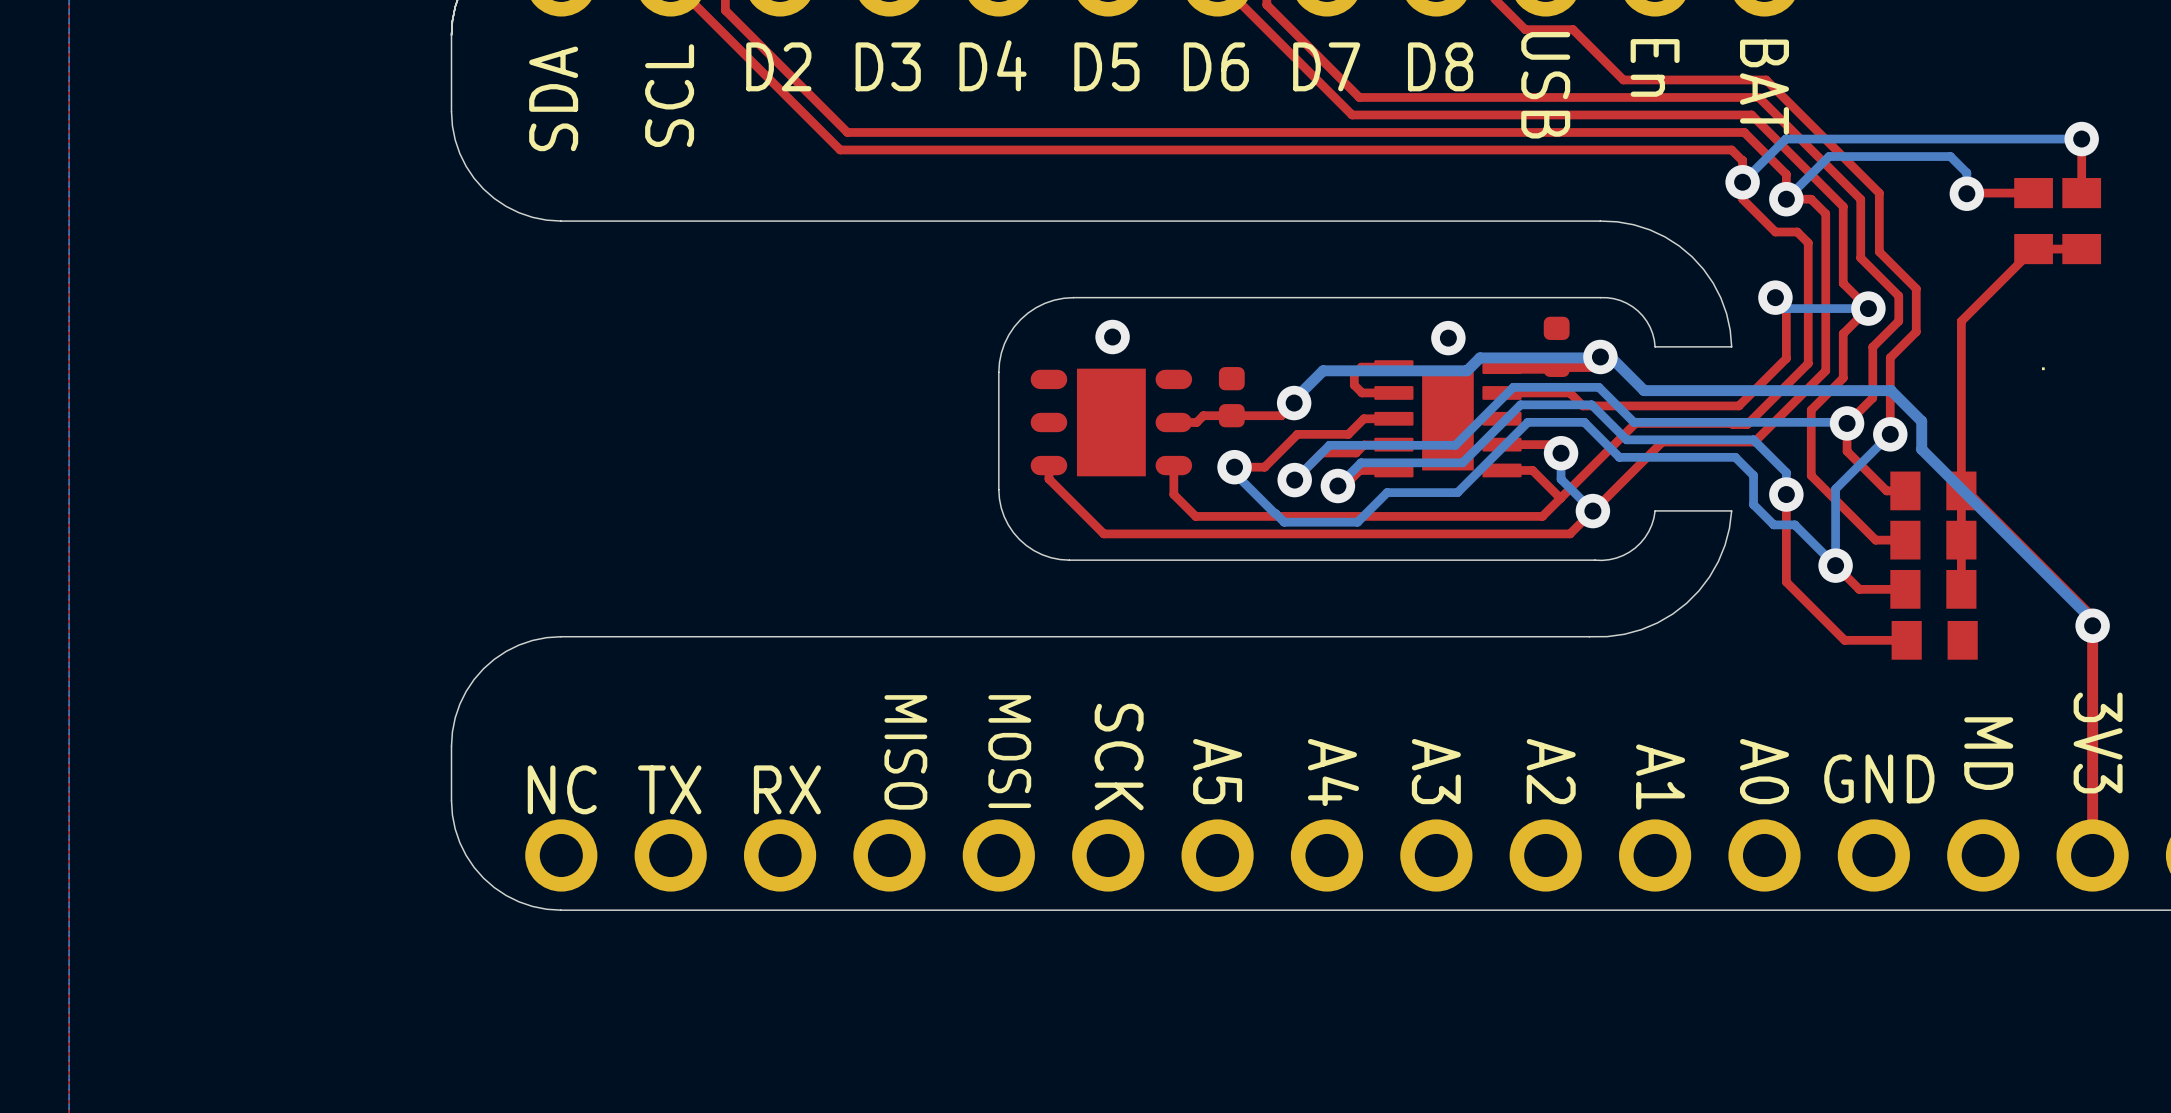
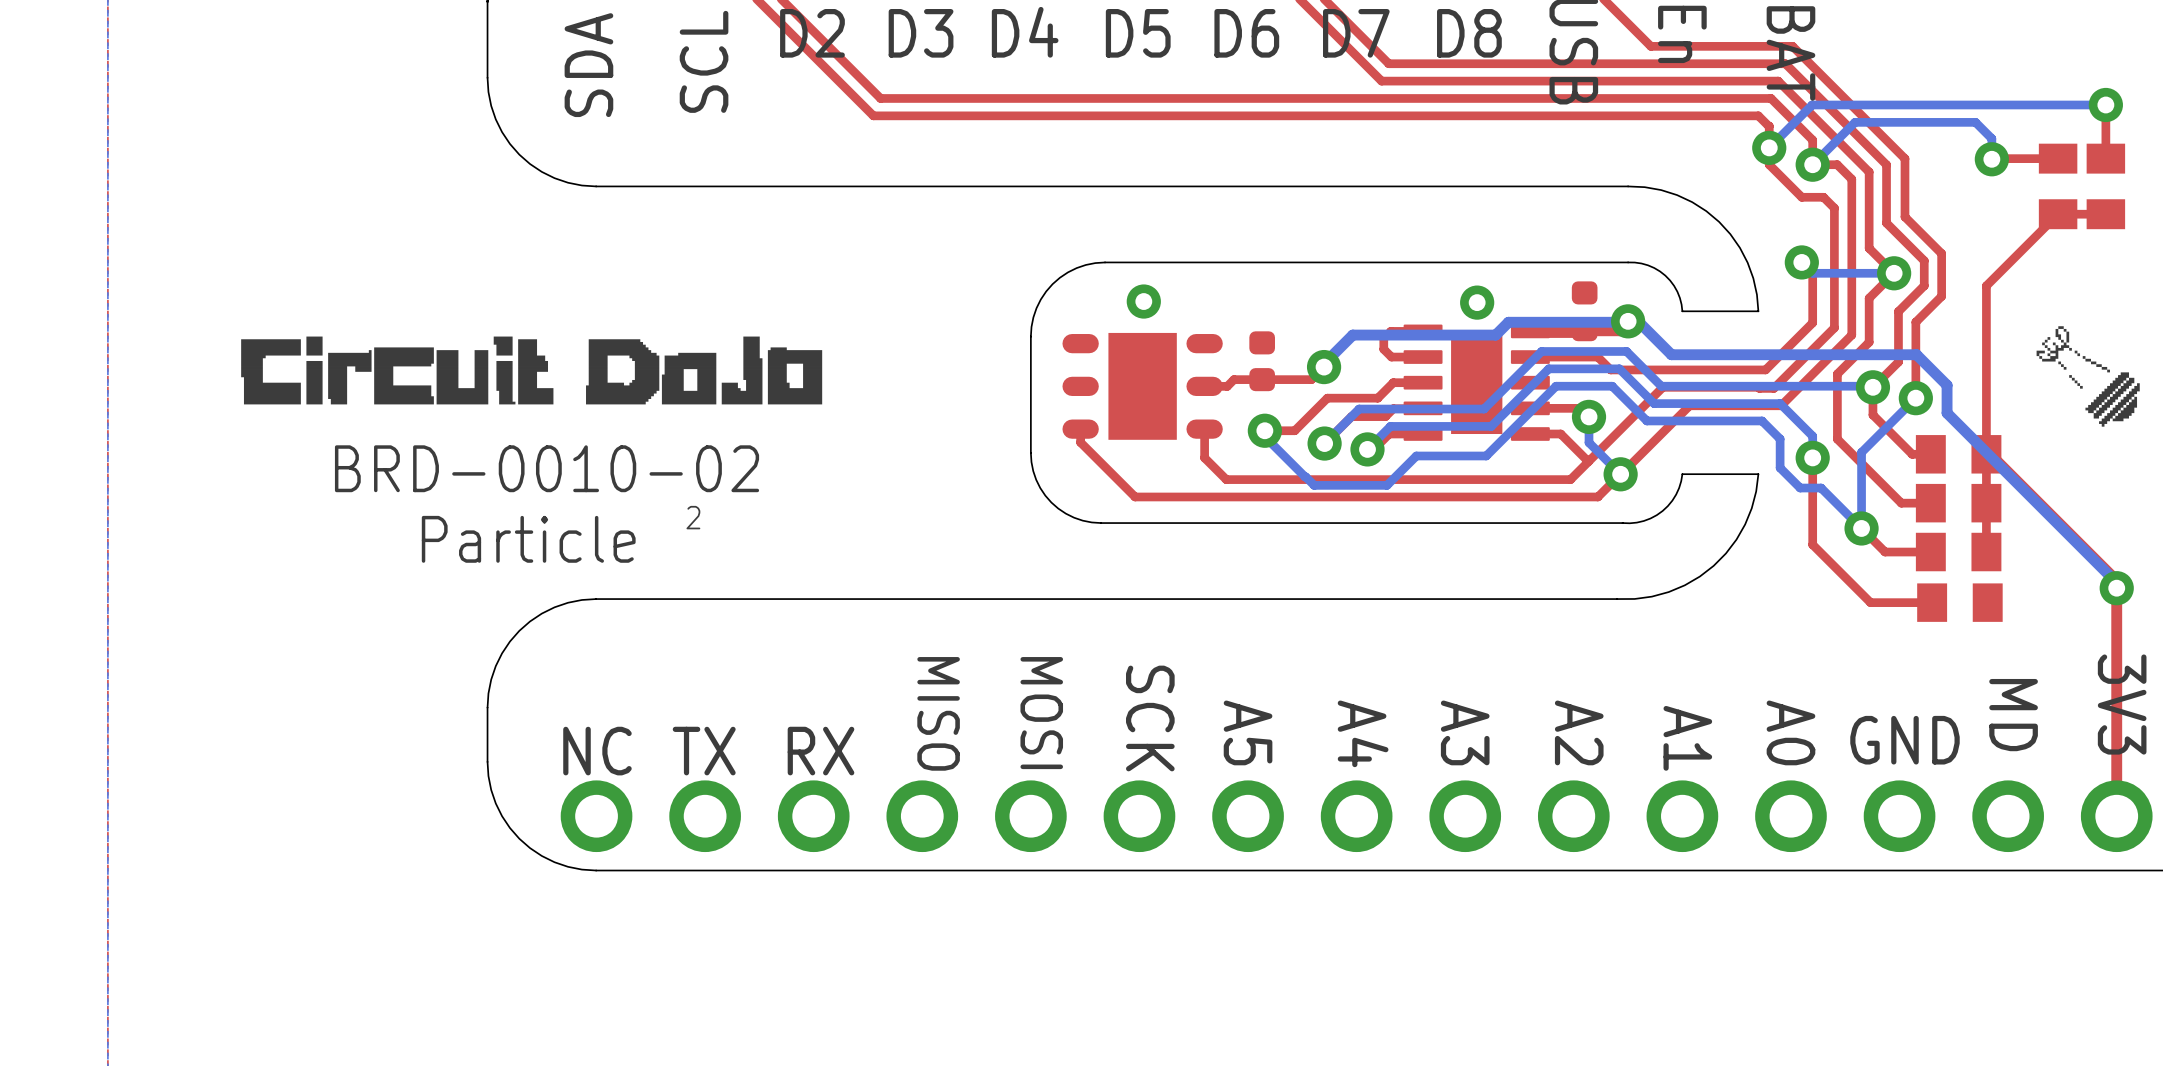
drawing: none -> [2036, 326, 2140, 427]
drawing: none -> [241, 336, 823, 405]
text: none -> BRD-0010-02 (547, 468)
text: none -> 2 (693, 517)
text: none -> Particle (528, 539)

